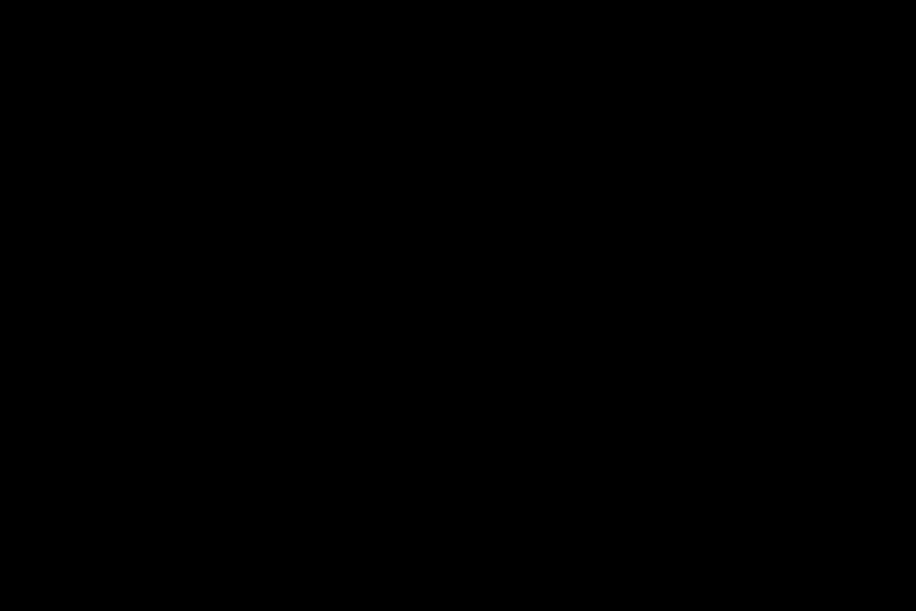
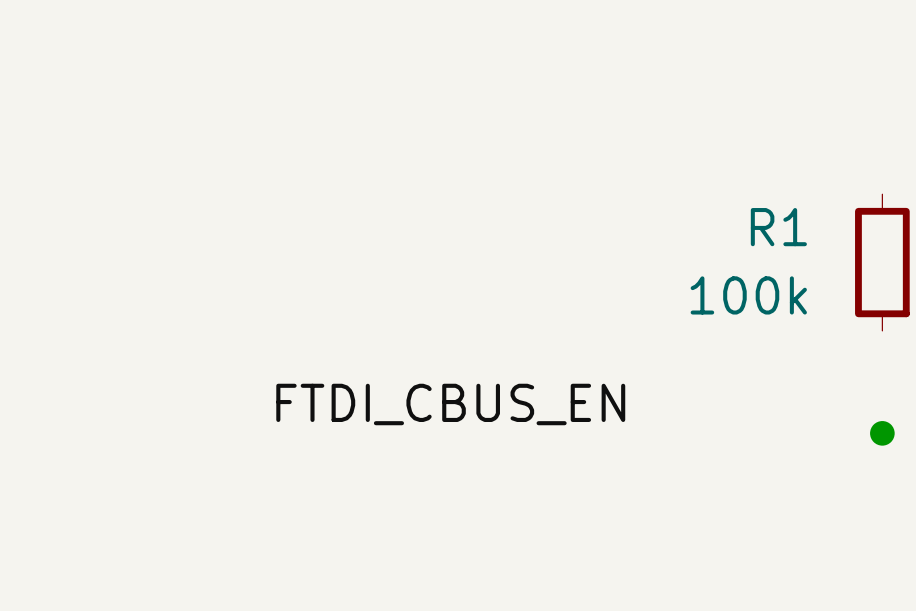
R1: none -> (882, 262)
label: none -> FTDI_CBUS_EN (450, 404)
junction: none -> (882, 433)

